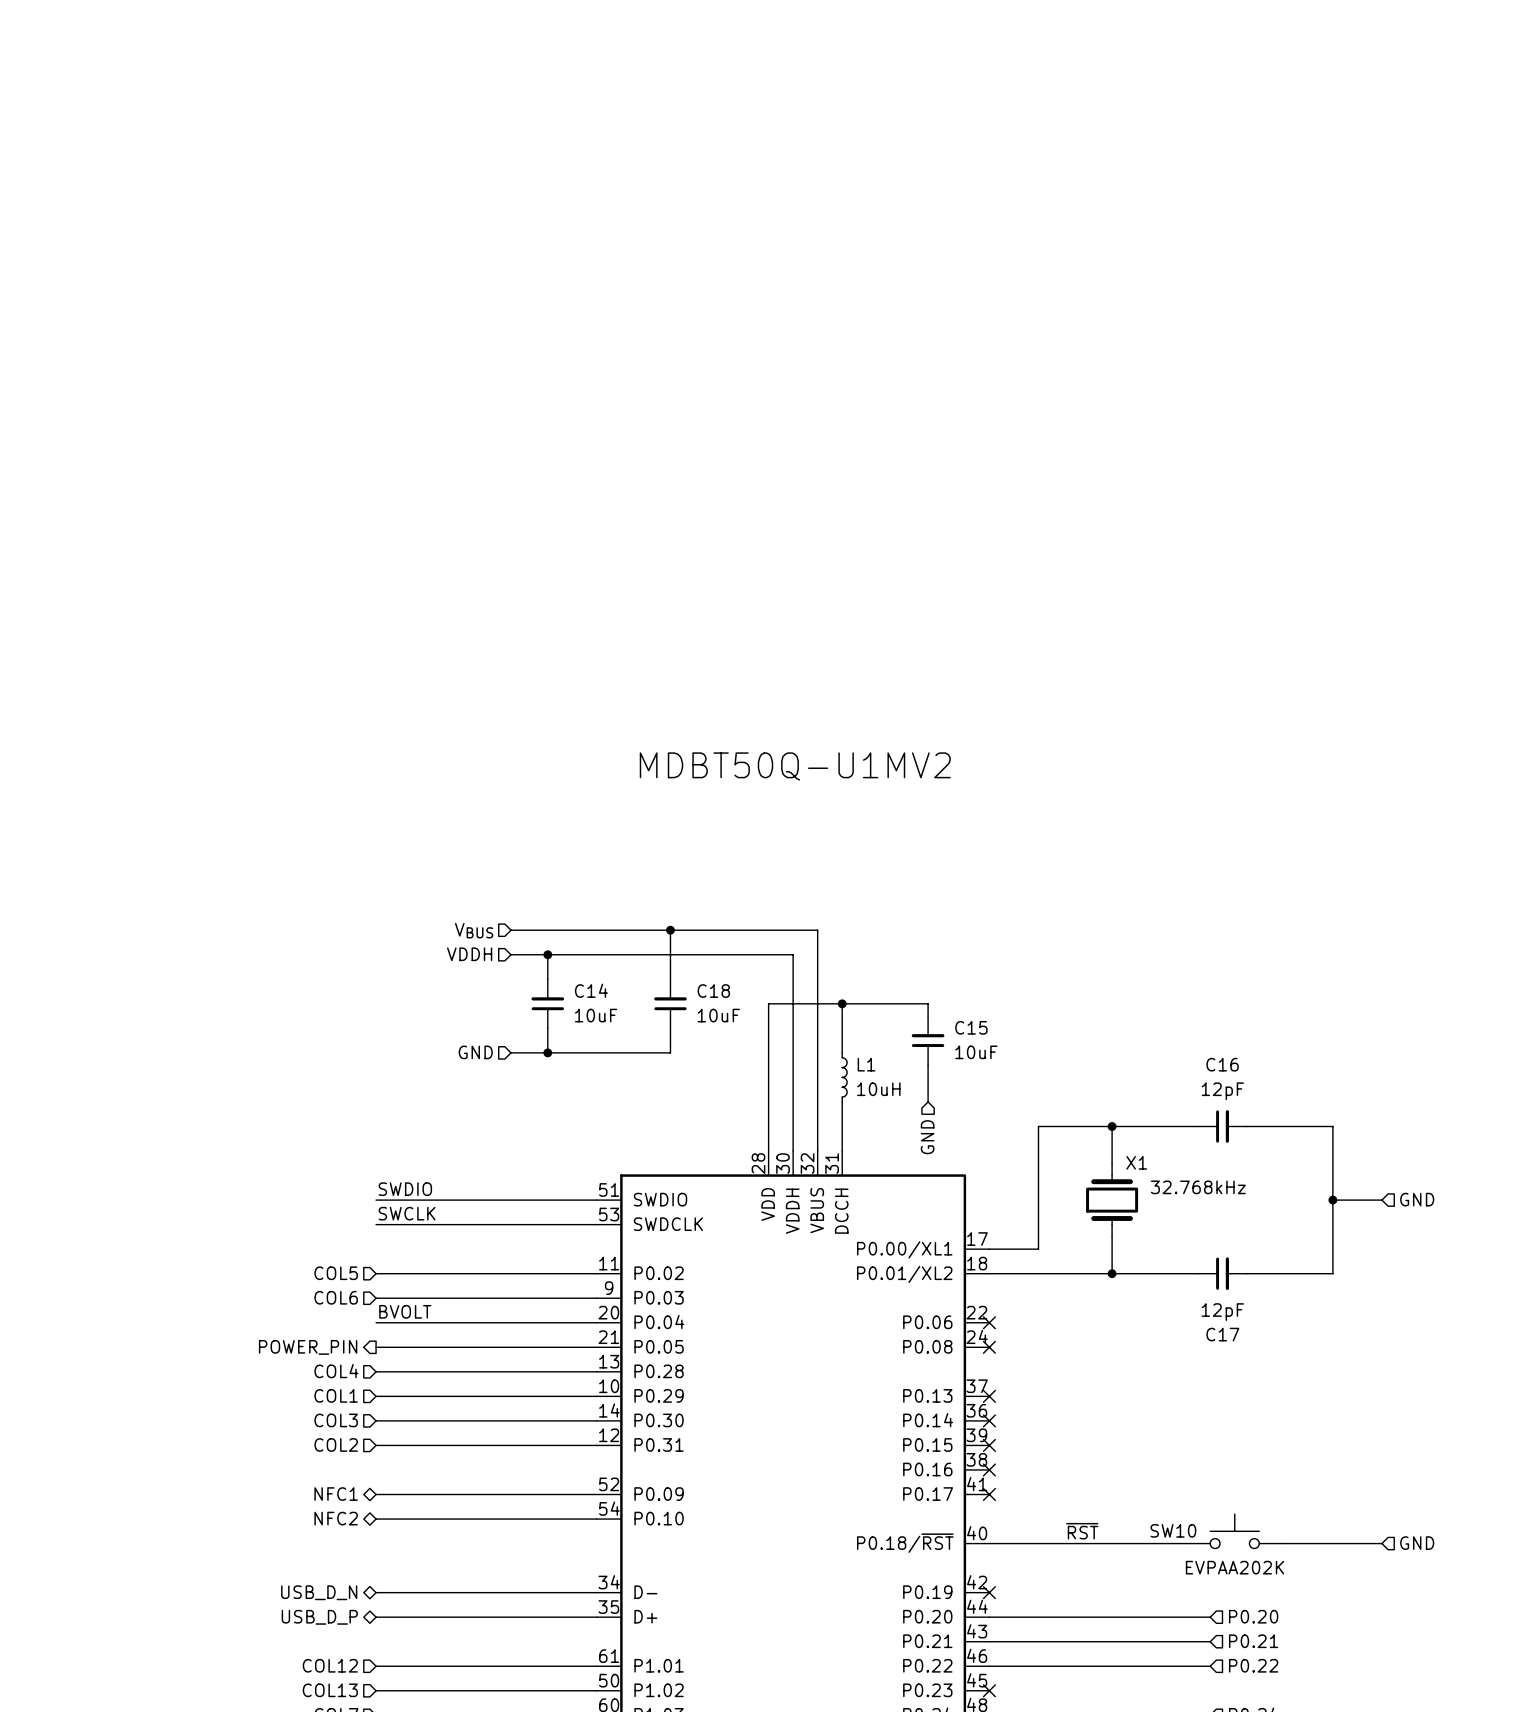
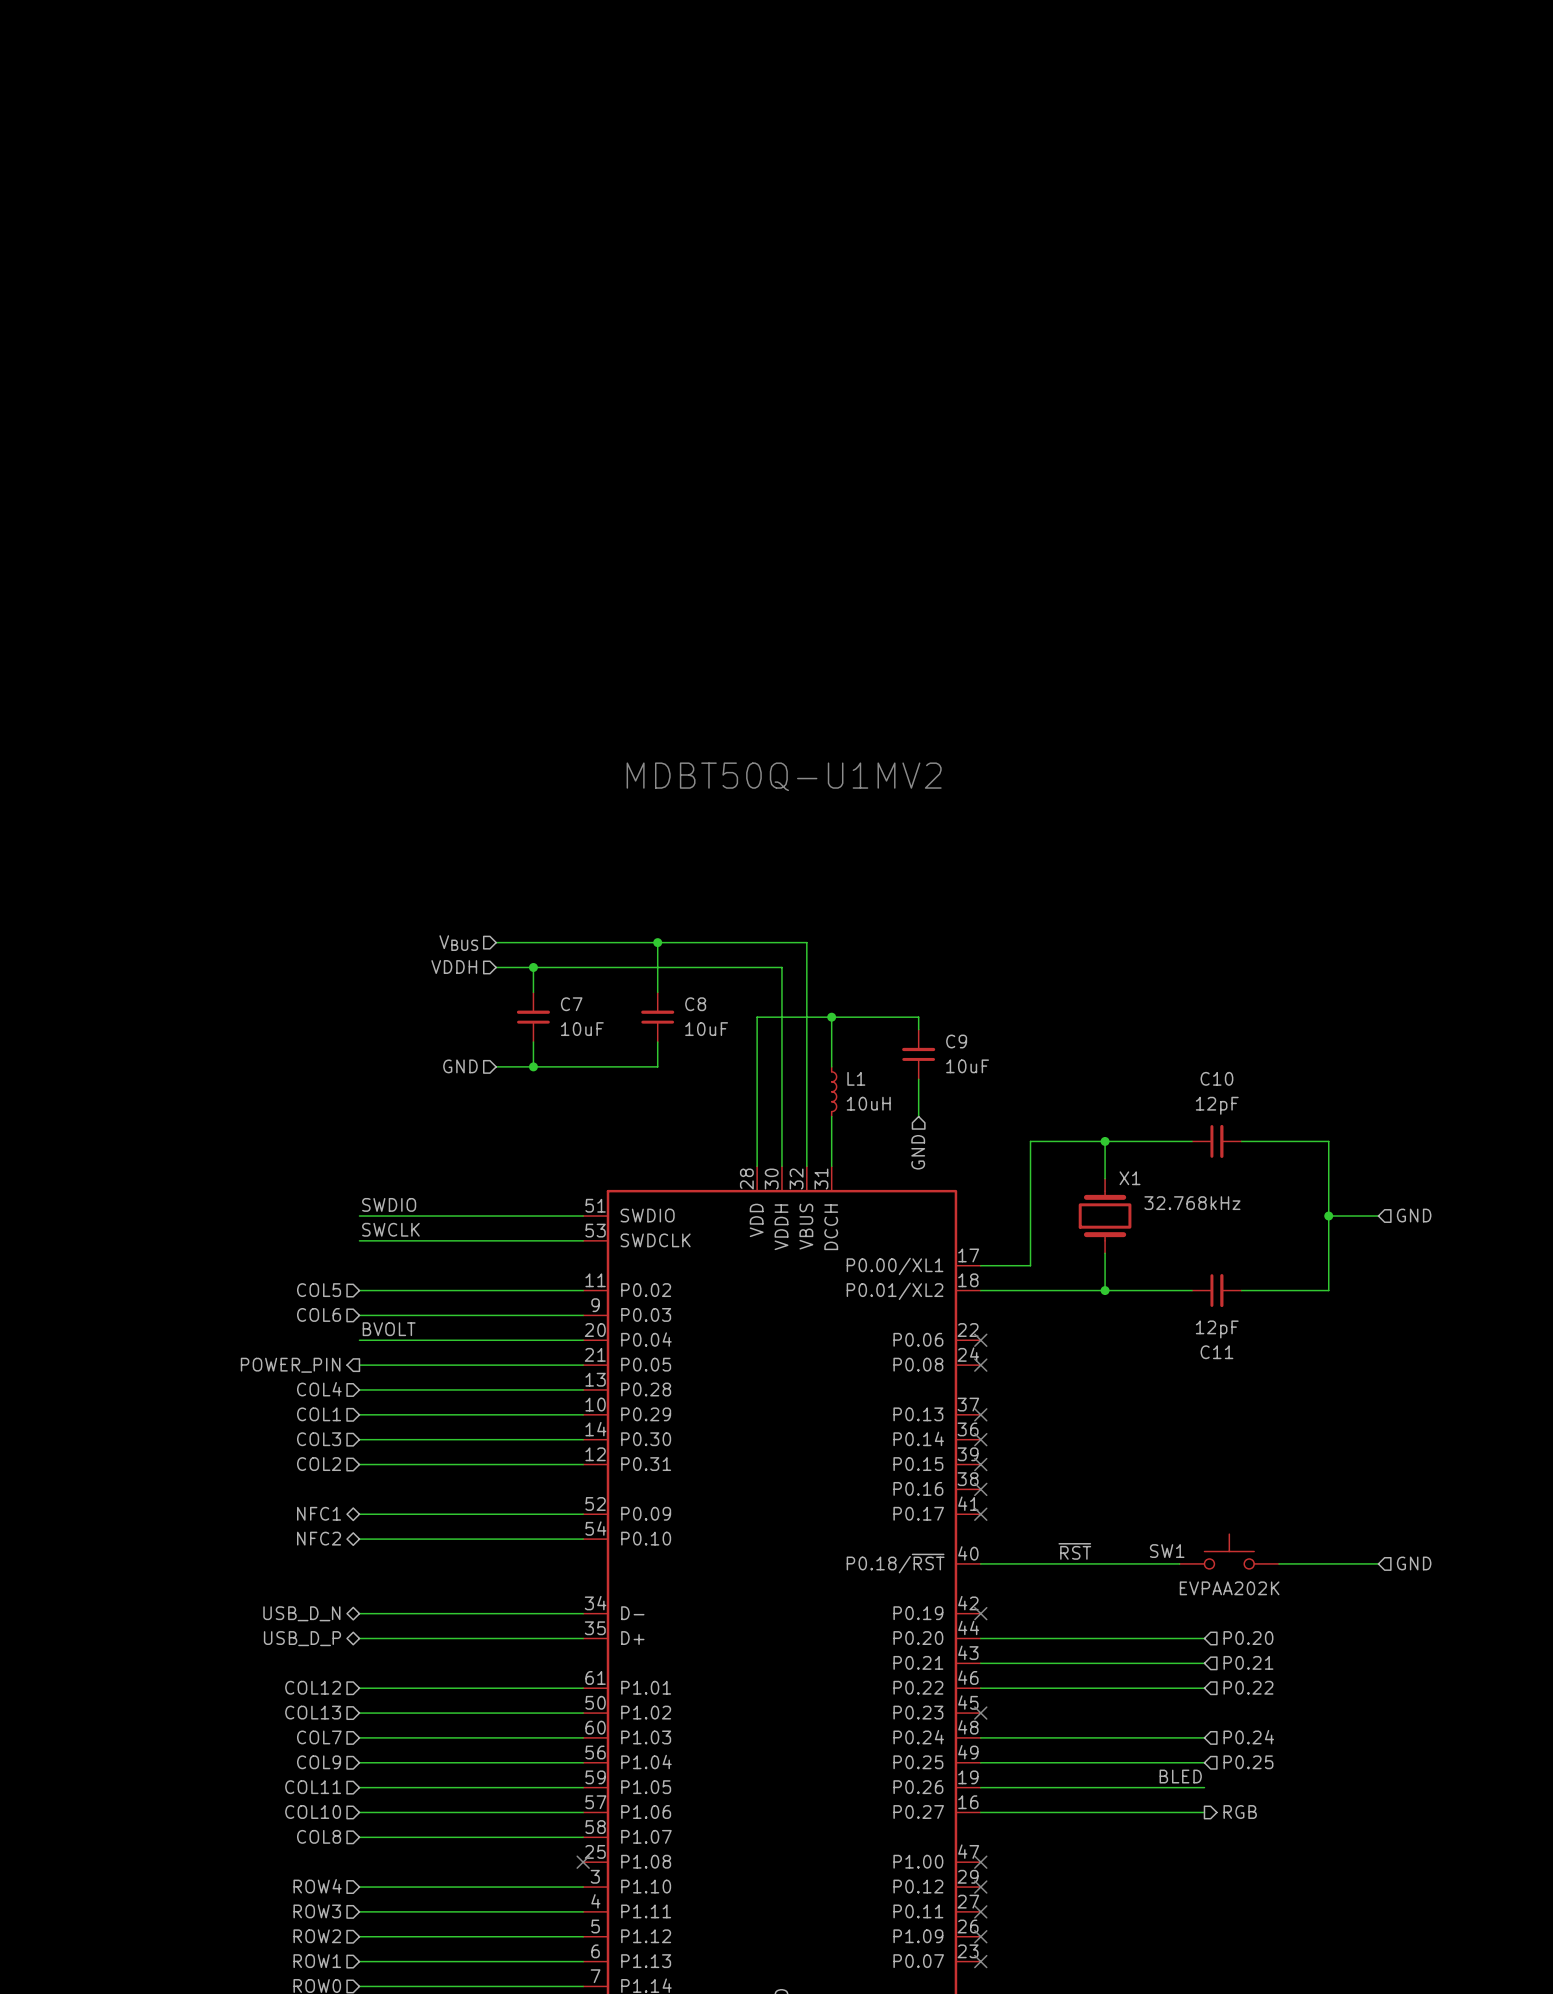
C14 name: C14 (591, 990) -> C7 (571, 1004)
C18 name: C18 (713, 991) -> C8 (695, 1004)
C15 name: C15 (971, 1027) -> C9 (956, 1041)
C16 name: C16 (1222, 1064) -> C10 (1216, 1078)
C17 name: C17 (1222, 1334) -> C11 (1216, 1352)
SW10 name: SW10 (1173, 1530) -> SW1 (1167, 1551)

